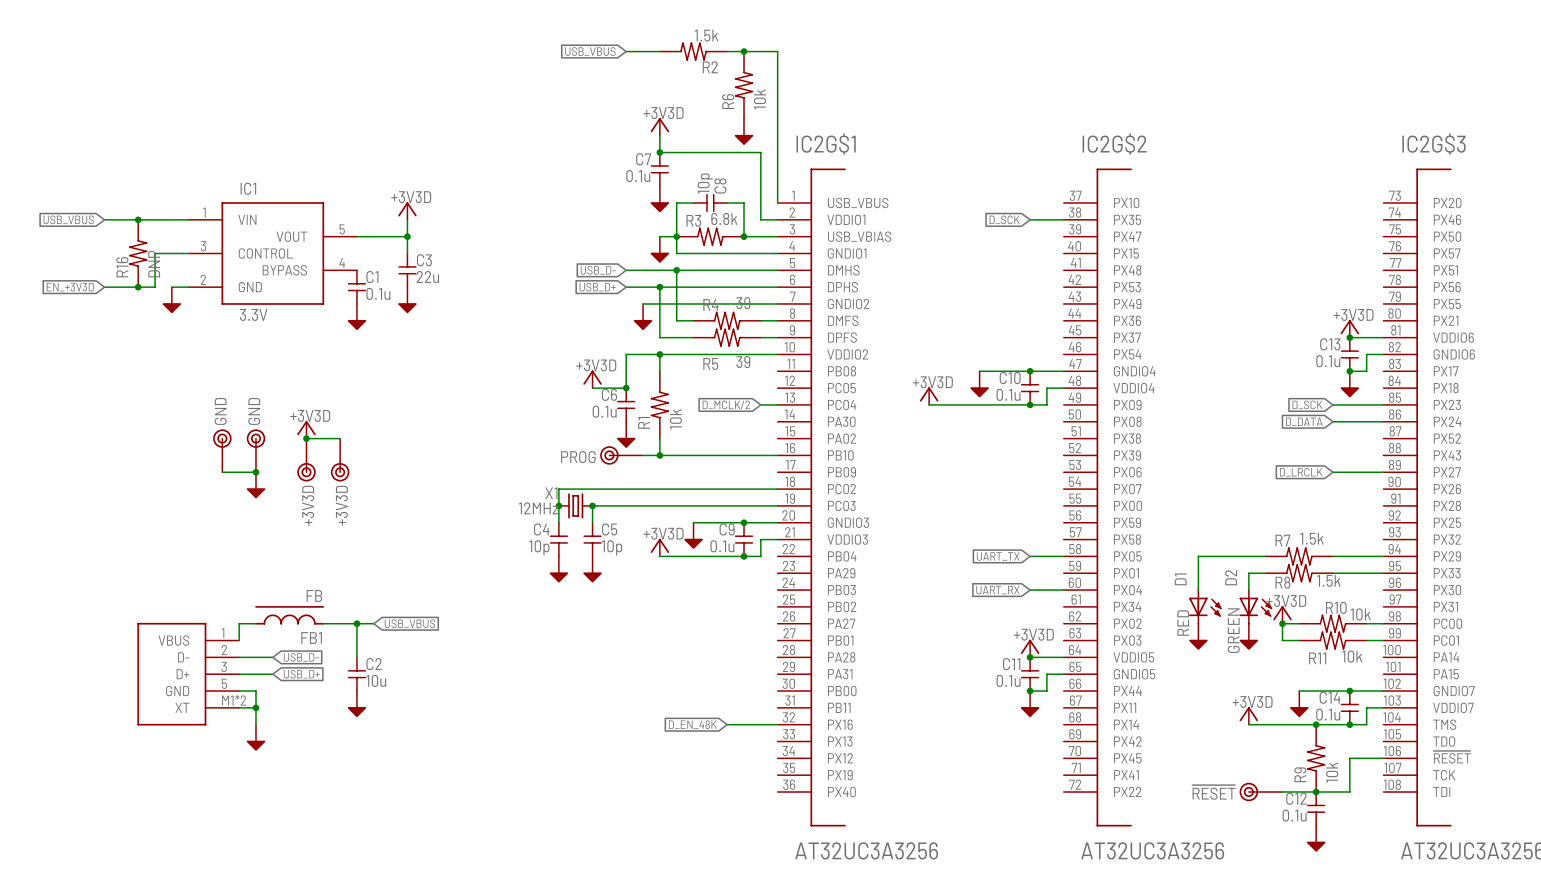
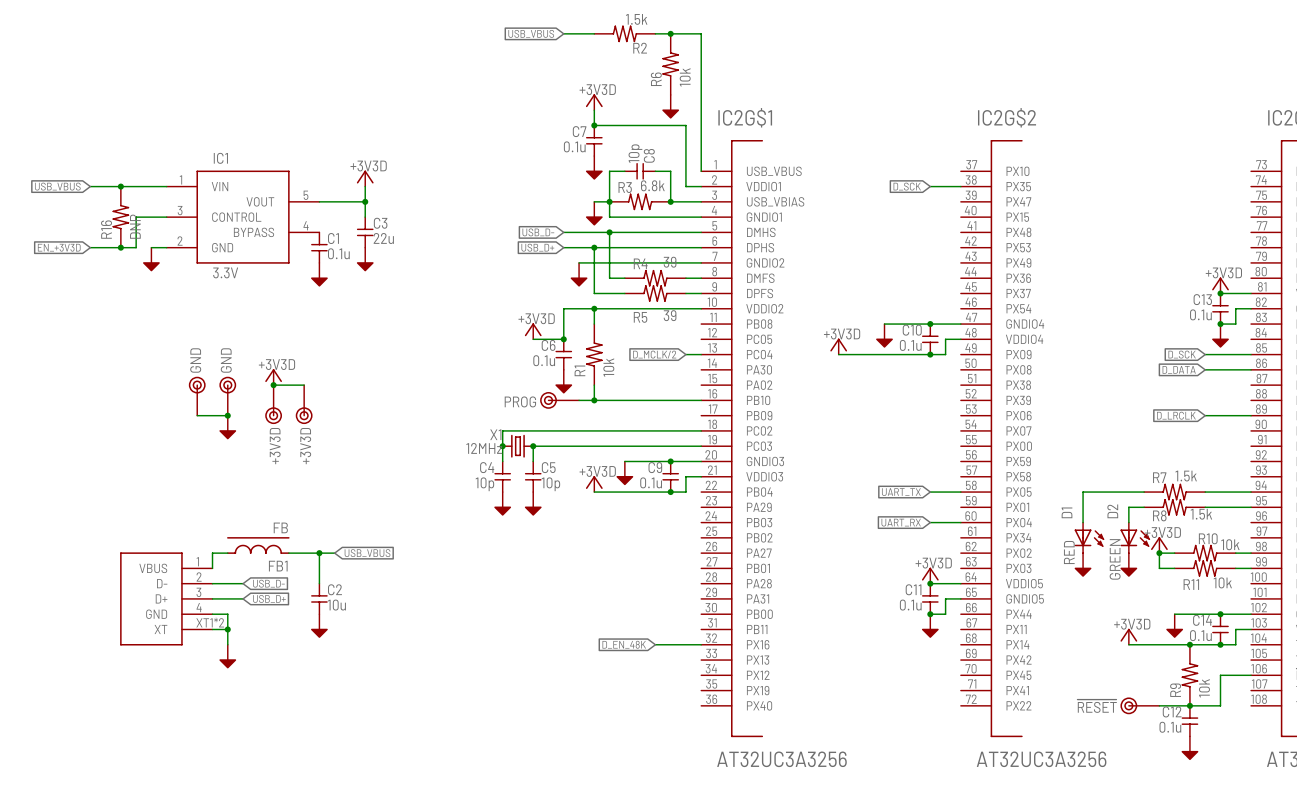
part pin number: 5 (224, 683) -> 4 (199, 607)
part pin number: M1*2 (234, 700) -> XT1*2 (210, 622)

